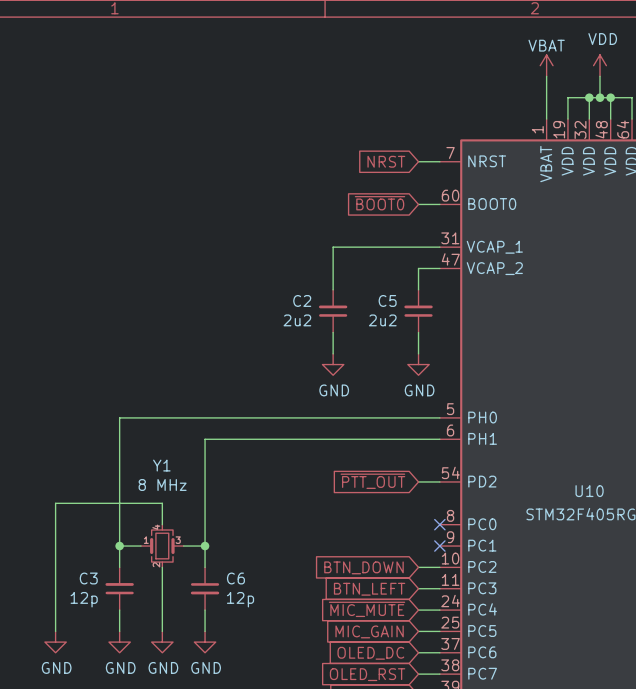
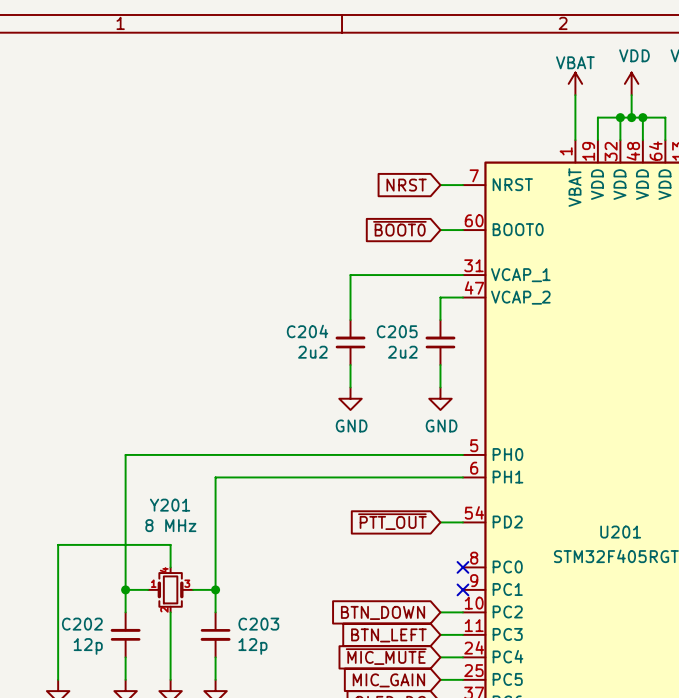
C2 name: C2 (302, 300) -> C204 (307, 331)
C5 name: C5 (387, 300) -> C205 (397, 331)
Y1 name: Y1 (161, 465) -> Y201 (170, 505)
U10 name: U10 (589, 491) -> U201 (620, 532)
C3 name: C3 (88, 578) -> C202 (82, 624)
C6 name: C6 (235, 578) -> C203 (258, 624)

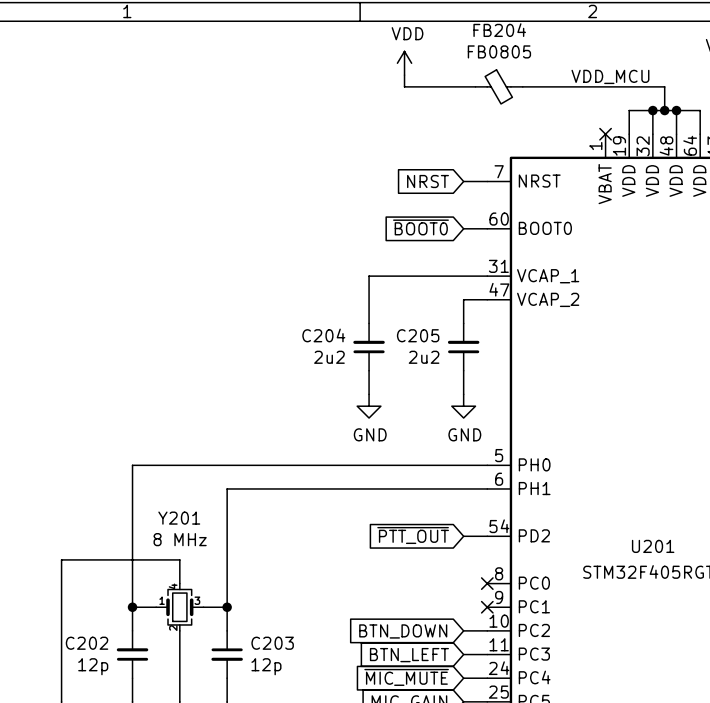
power symbol: none -> VDD (404, 63)
wire: none -> (404, 75) (404, 86) (475, 86)
power symbol: VBAT (575, 83) -> none
power symbol: VDD (631, 83) -> none
label: none -> VDD_MCU (610, 76)
FB204: none -> FB0805 (499, 86)
wire: none -> (522, 86) (664, 86)
wire: (575, 95) (575, 140) -> none
no-connect mark: none -> (605, 134)

